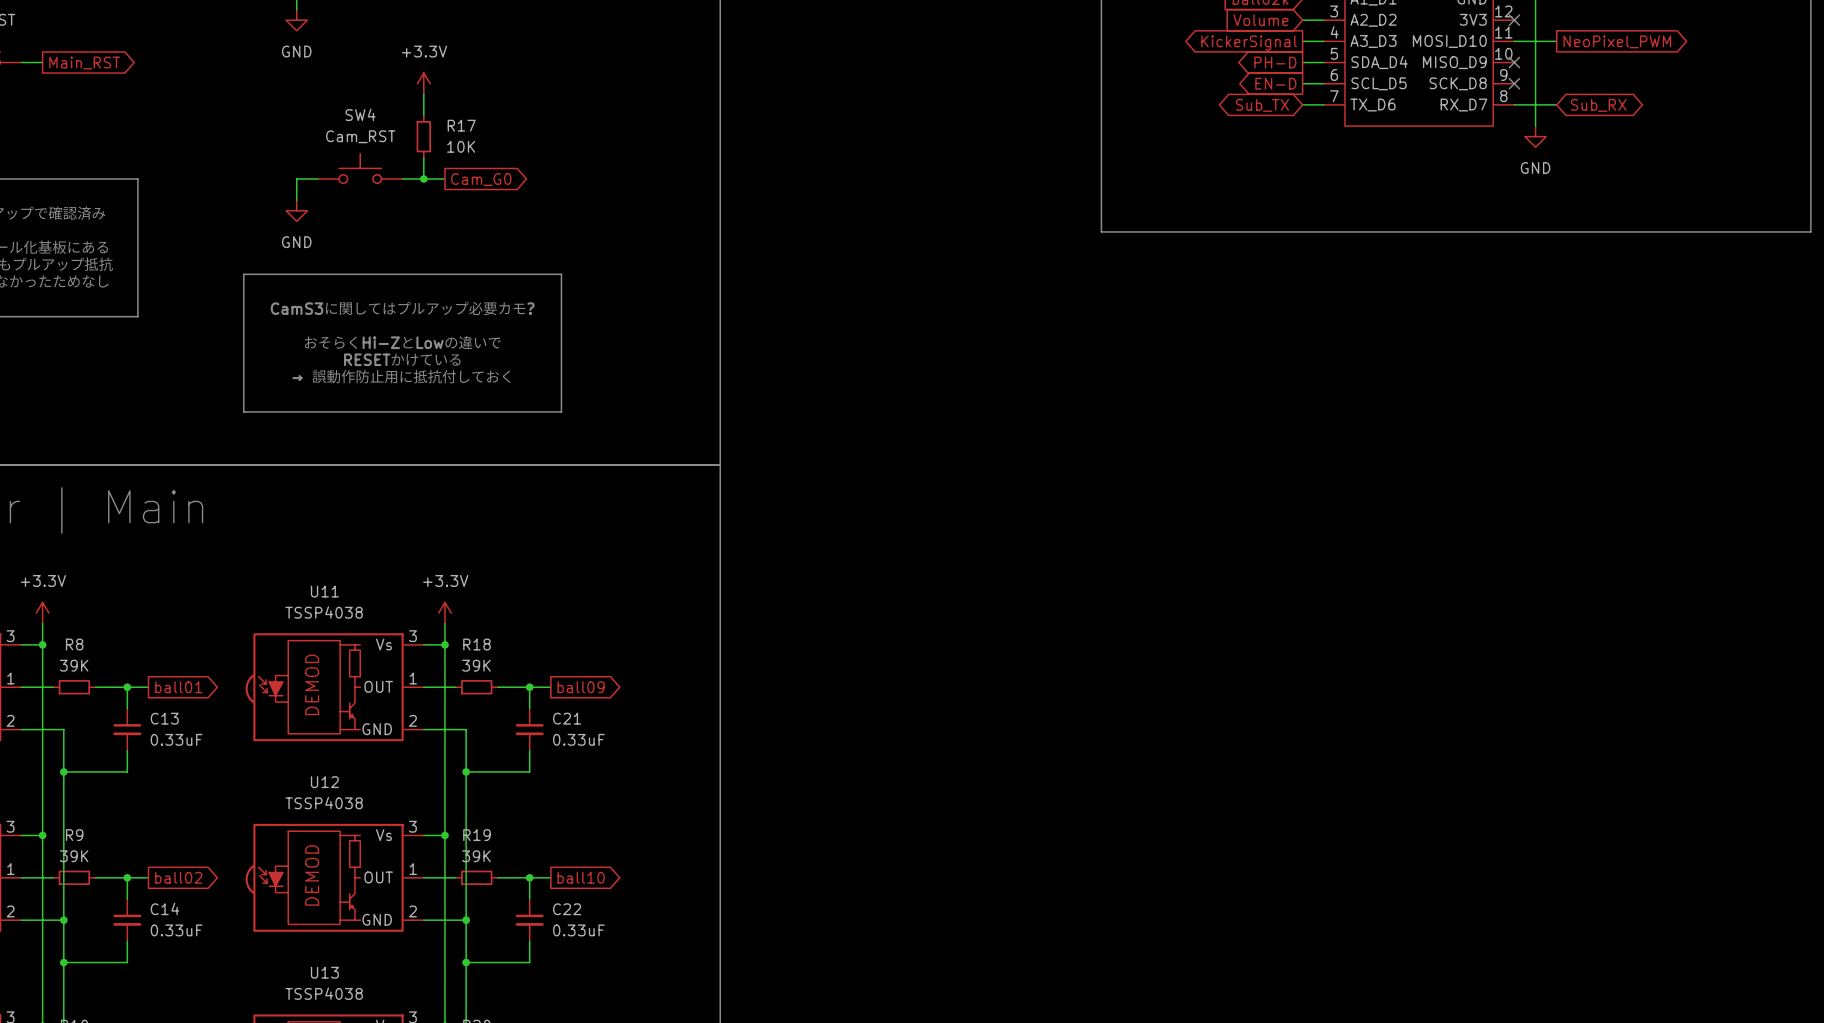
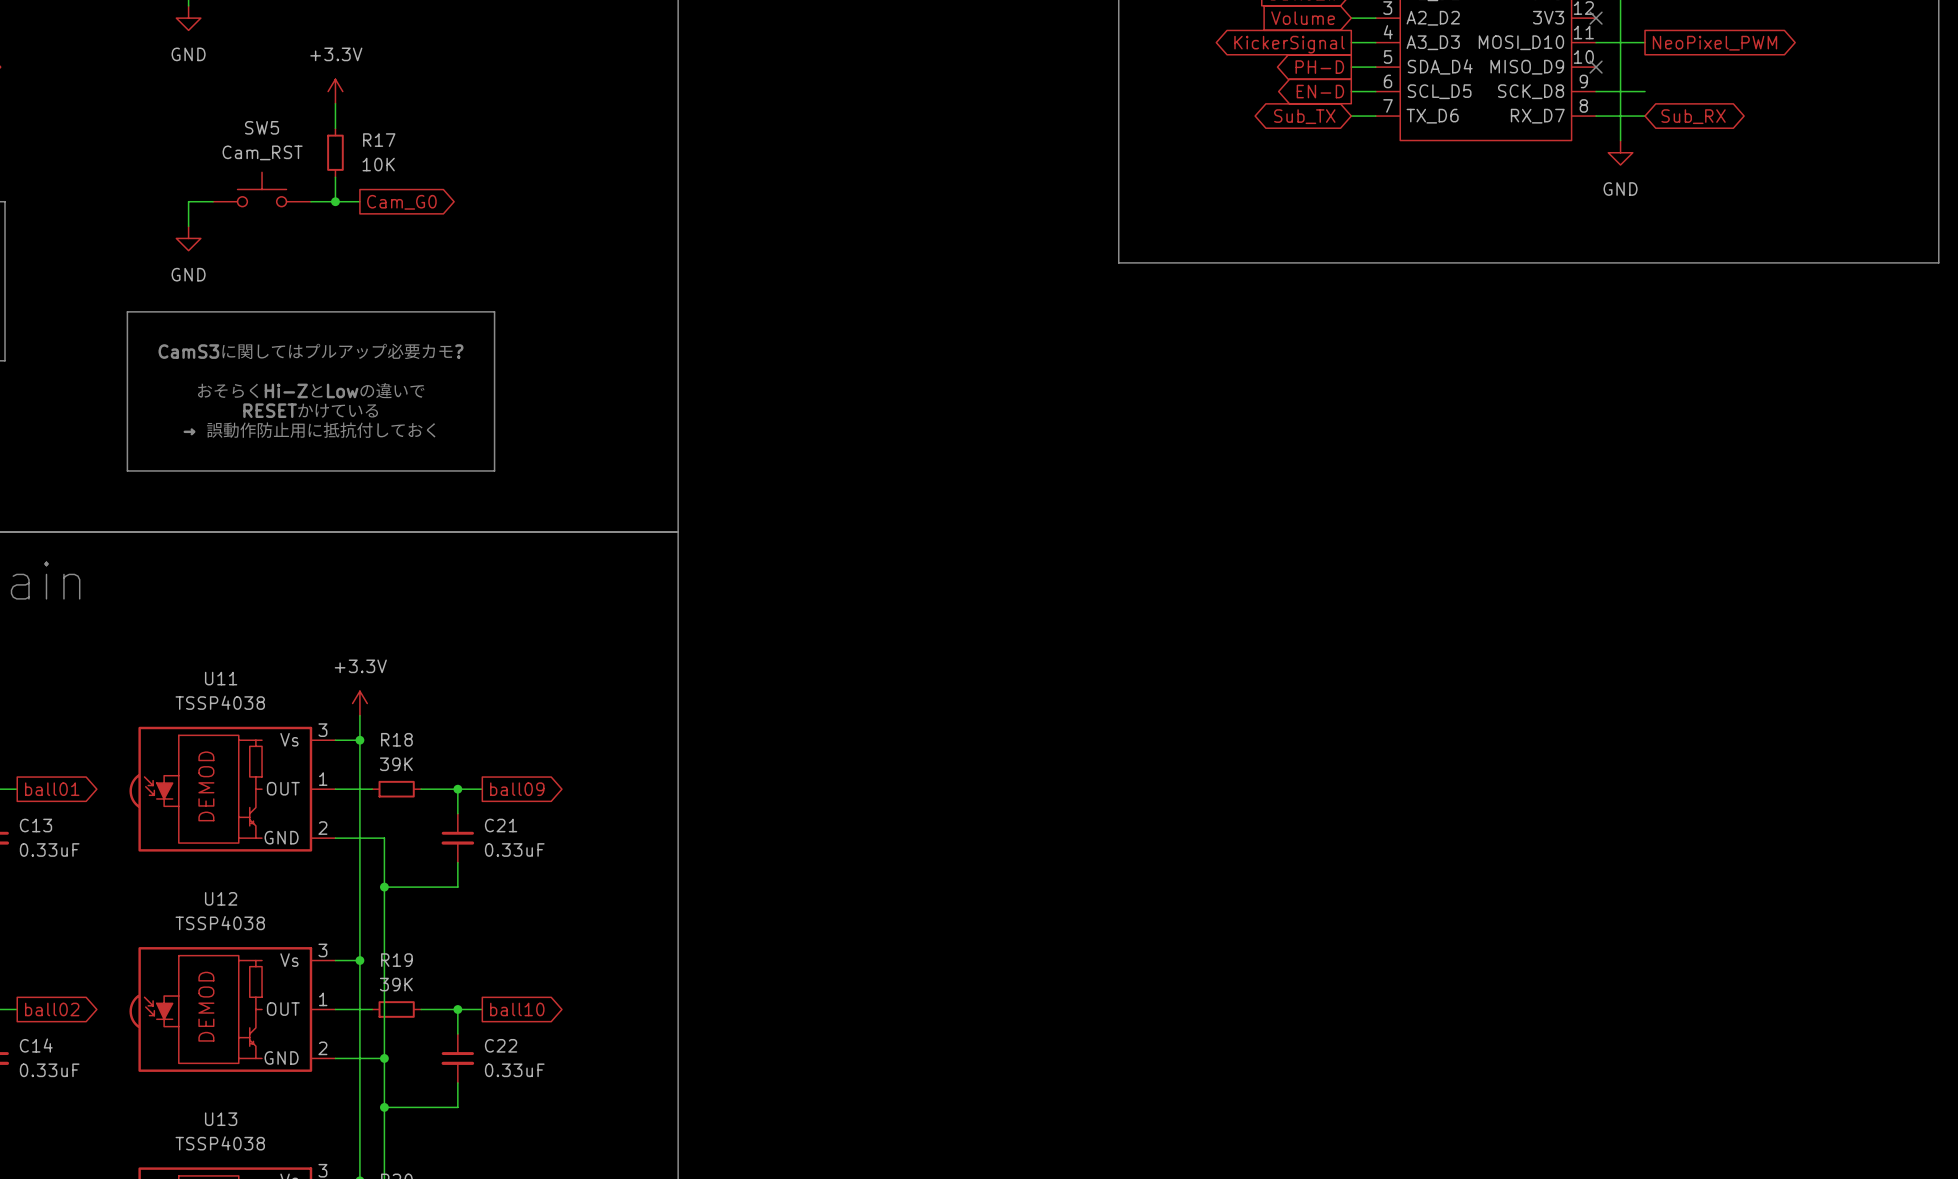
wire: none -> (1596, 91) (1645, 91)
no-connect mark: (1514, 83) -> none
SW4 name: SW4 (360, 114) -> SW5 (262, 127)

